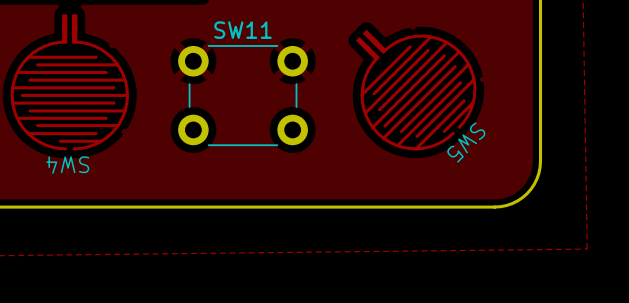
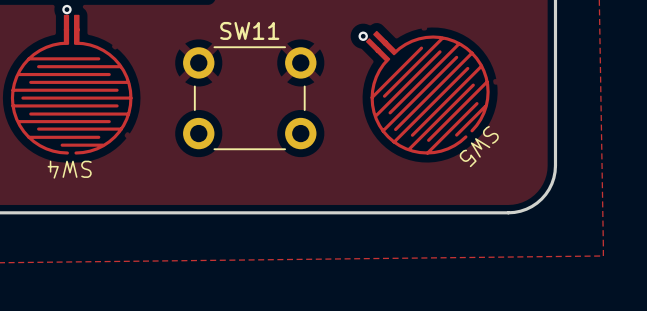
via: none -> (66, 9)
via: none -> (363, 36)

